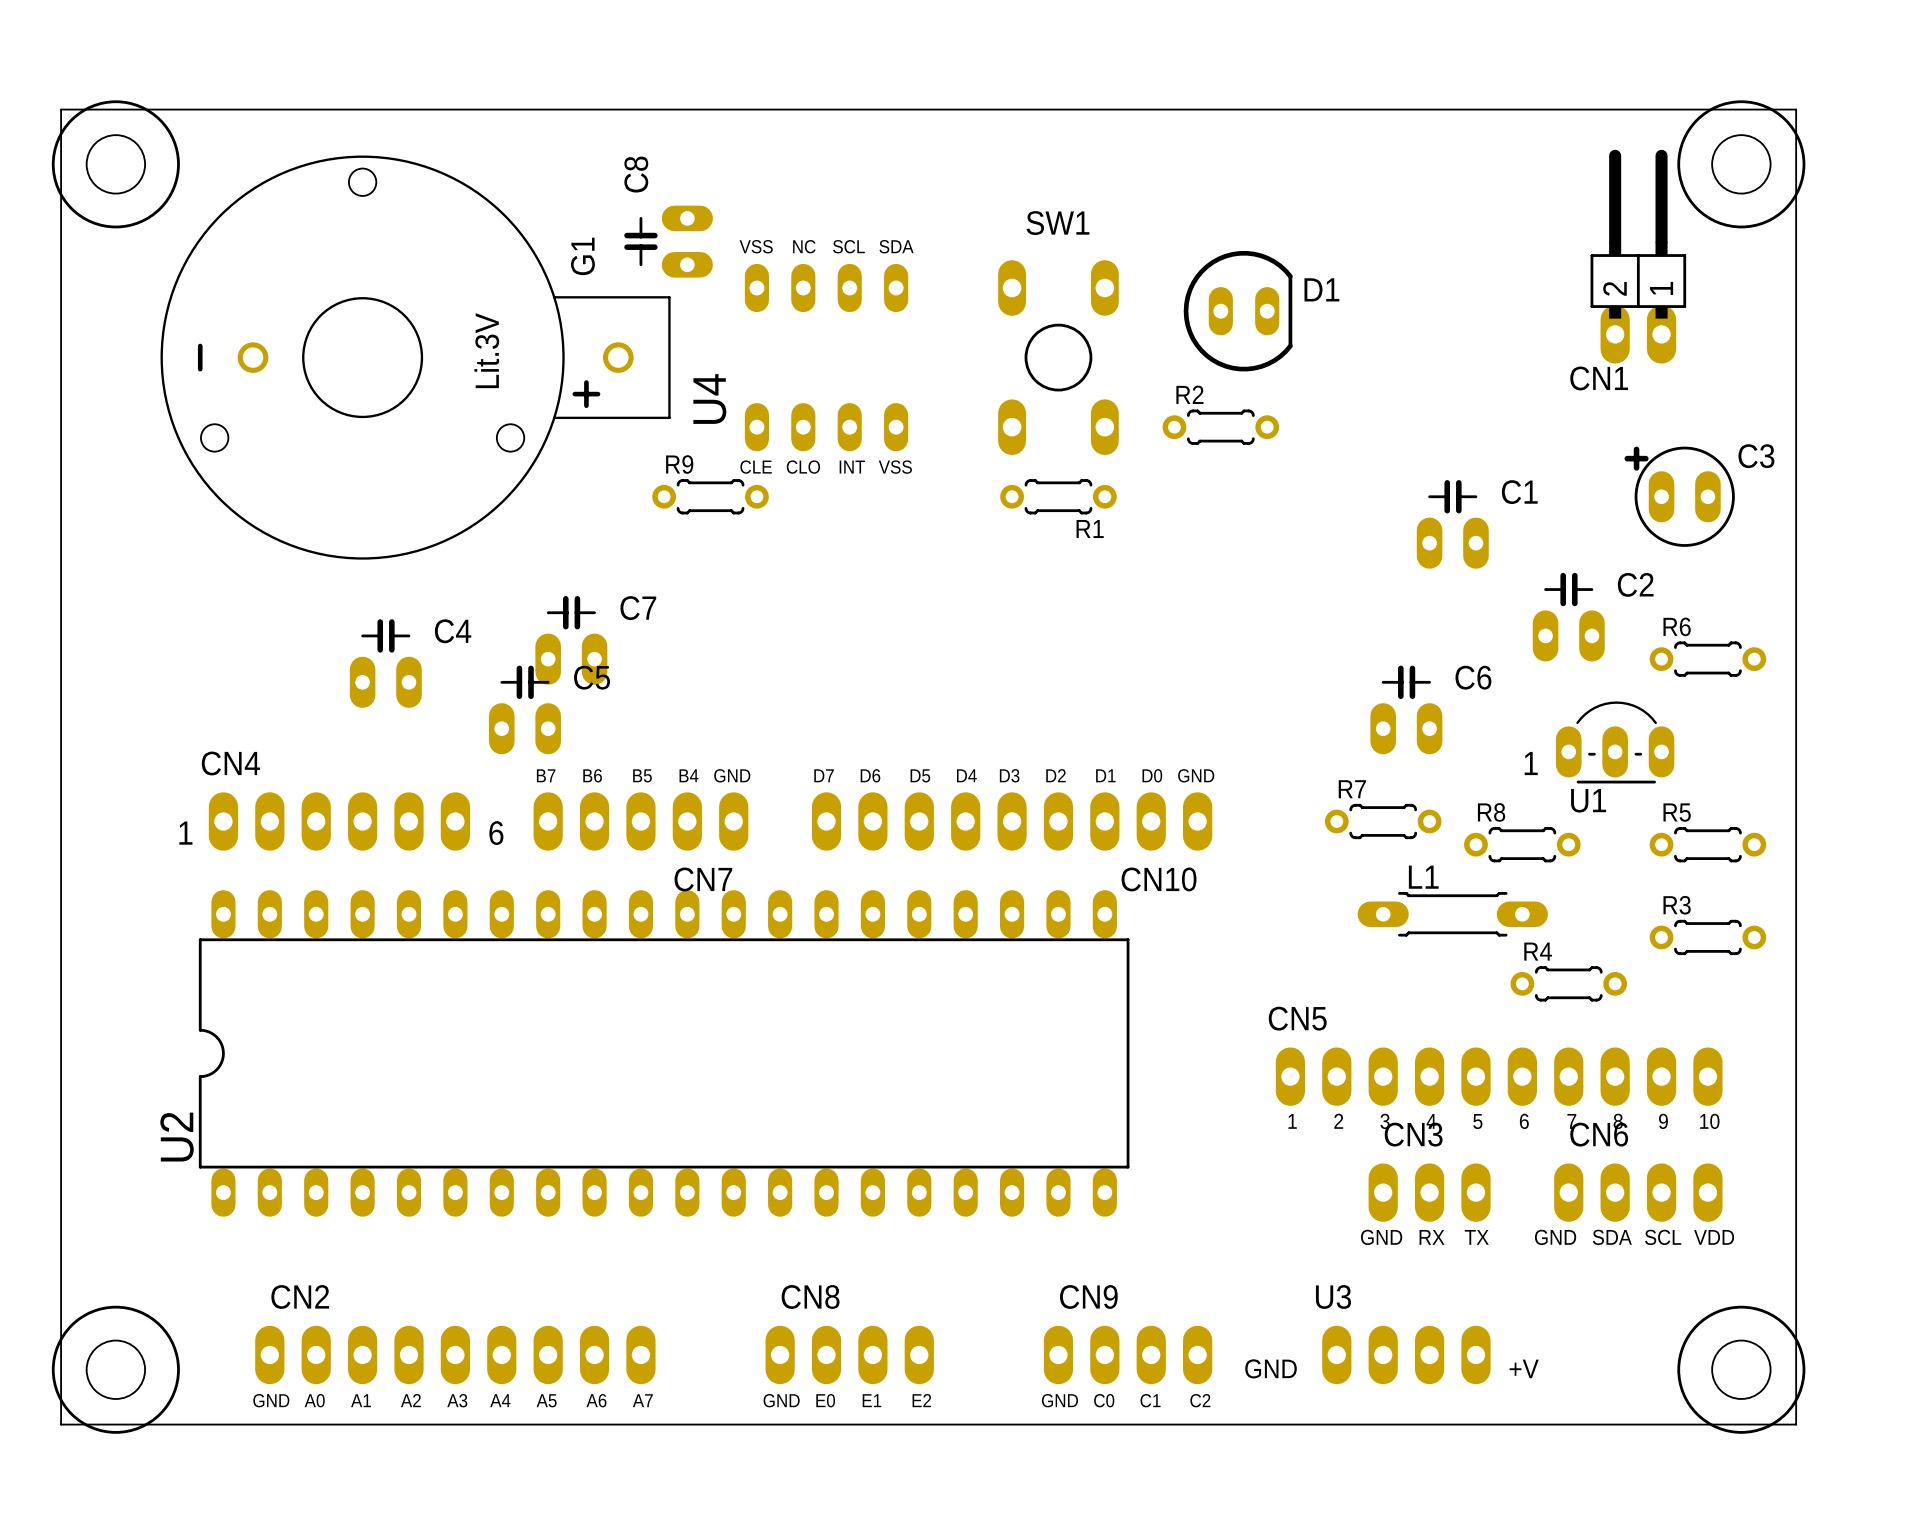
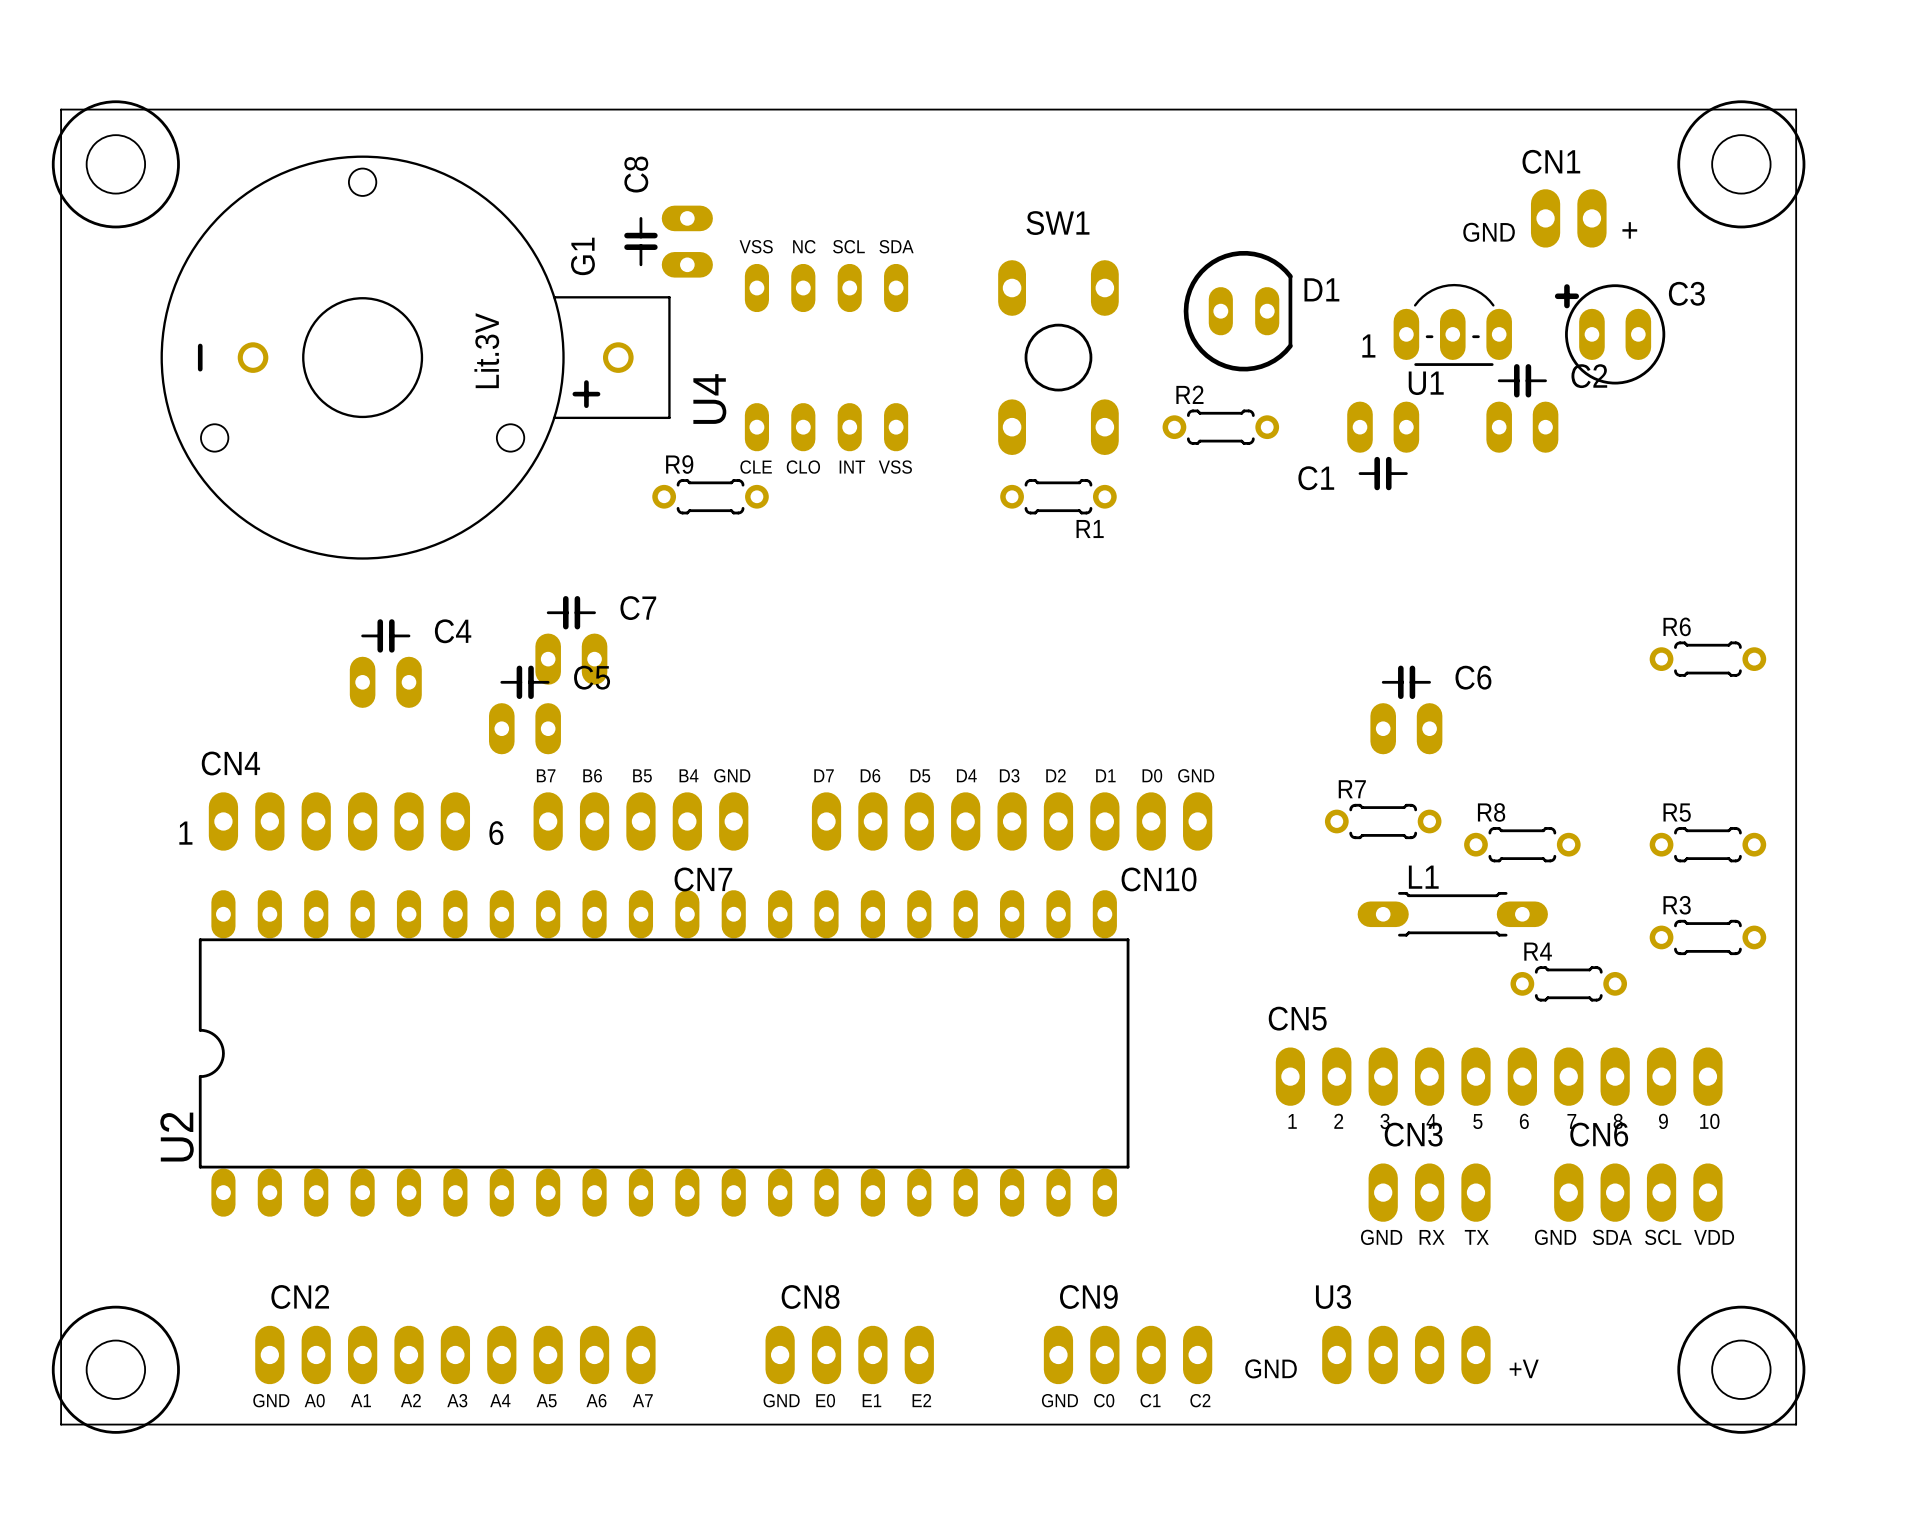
CN1 footprint: [1590, 149, 1687, 364] -> [1530, 189, 1607, 248]
CN1 name position: CN1 (1599, 378) -> CN1 (1551, 161)
C3 position: (1679, 496) -> (1610, 334)
C1 rotation: 0° (1452, 524) -> 180° (1383, 445)
C1 position: (1452, 524) -> (1383, 445)
C2 position: (1568, 617) -> (1522, 408)
U1 position: (1615, 742) -> (1452, 324)

